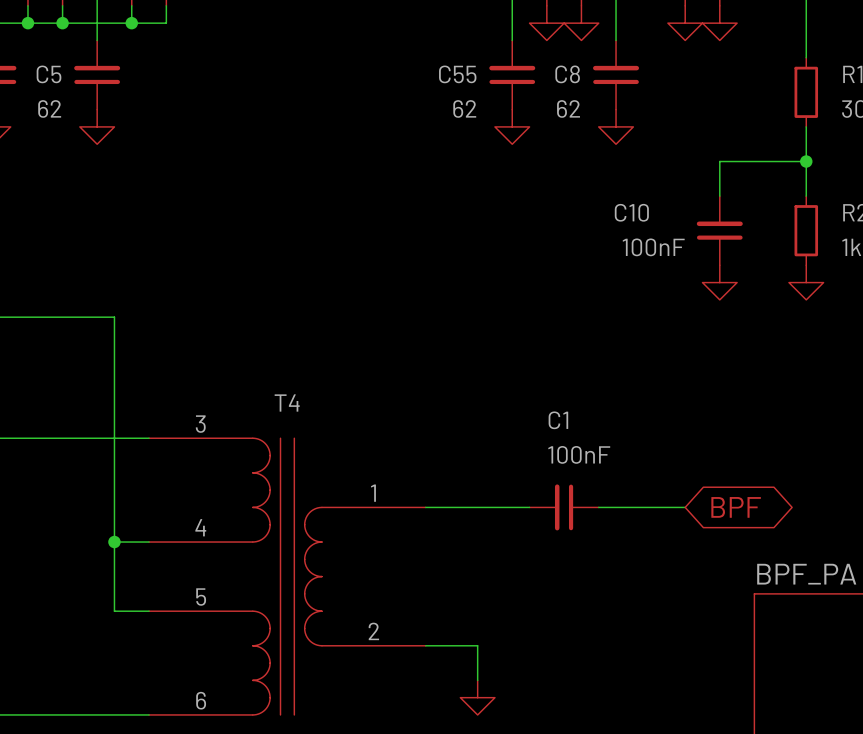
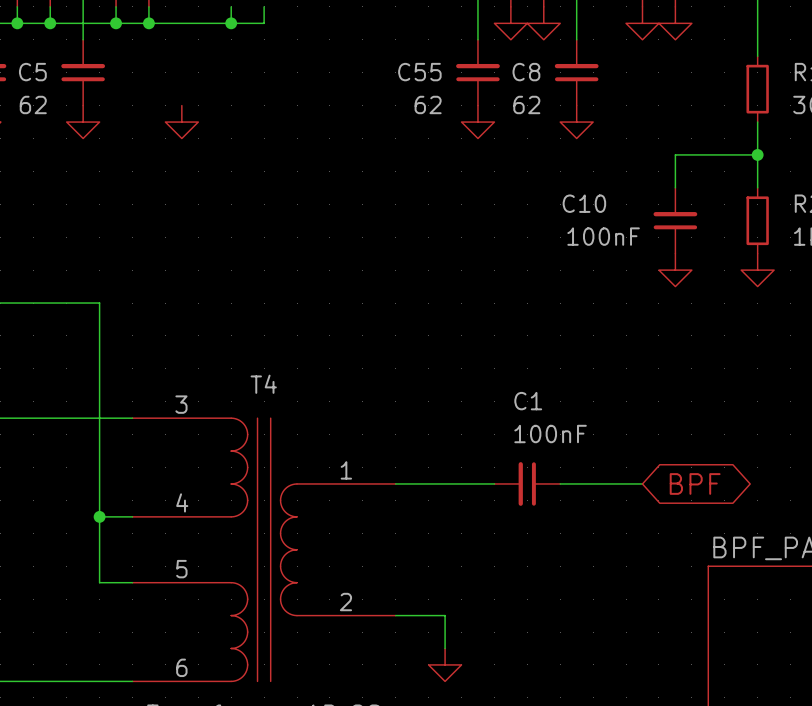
wire: none -> (231, 6) (231, 23)
wire: none -> (264, 6) (264, 23) (148, 23)
junction: none -> (148, 23)
junction: none -> (231, 23)
power symbol: none -> (181, 122)

